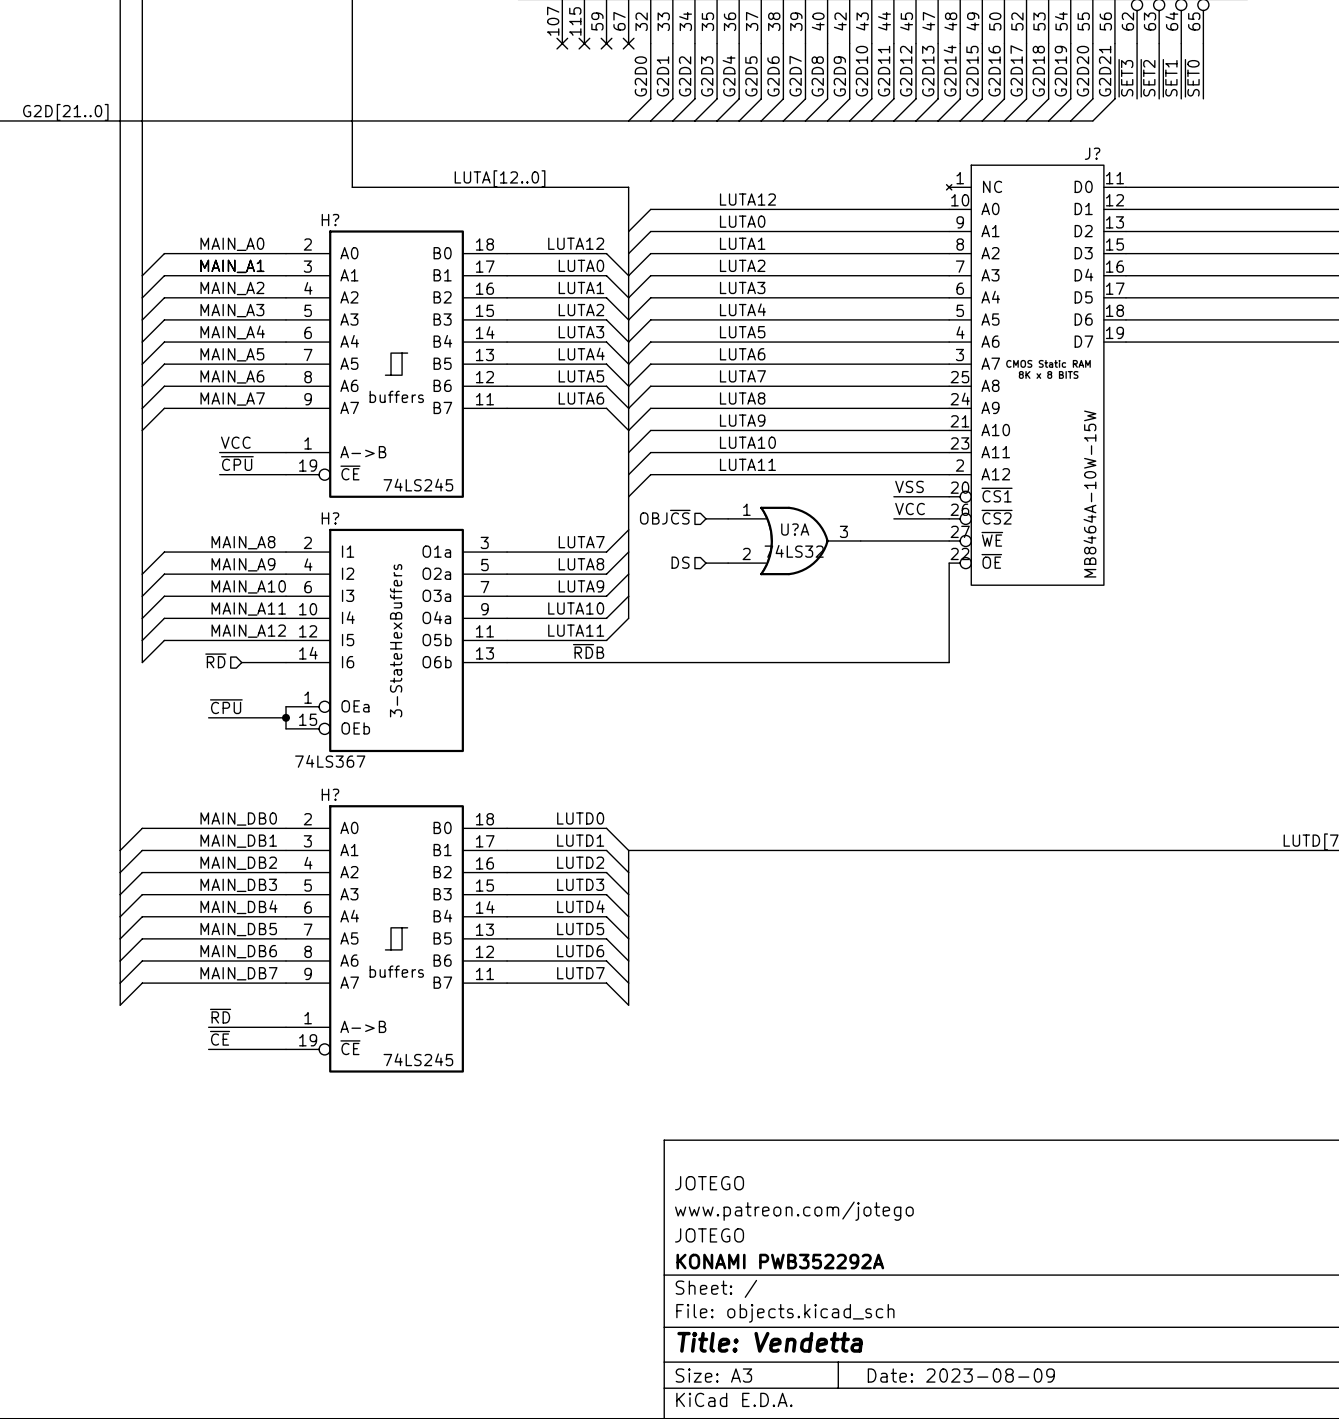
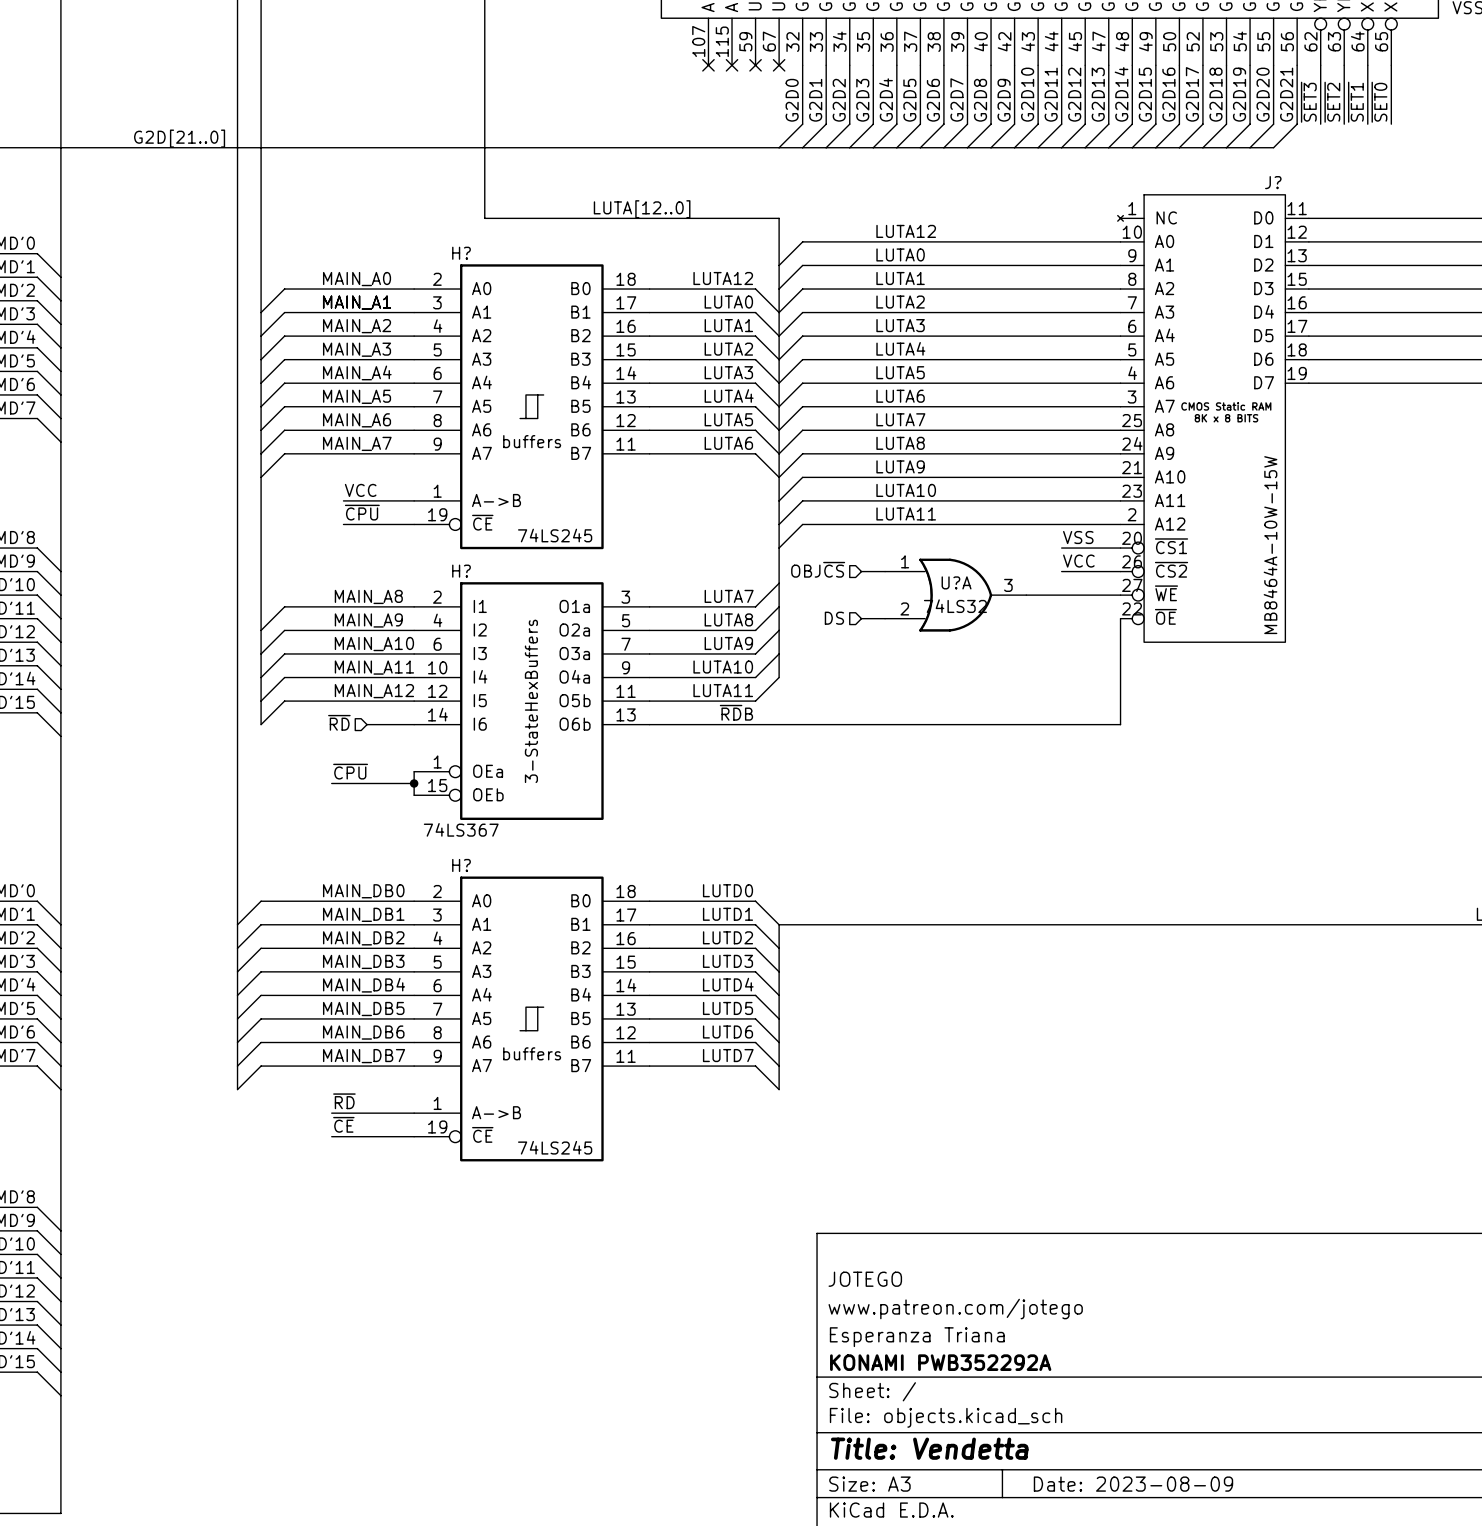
title block: JOTEGO (709, 1235) -> Esperanza Triana (917, 1337)

